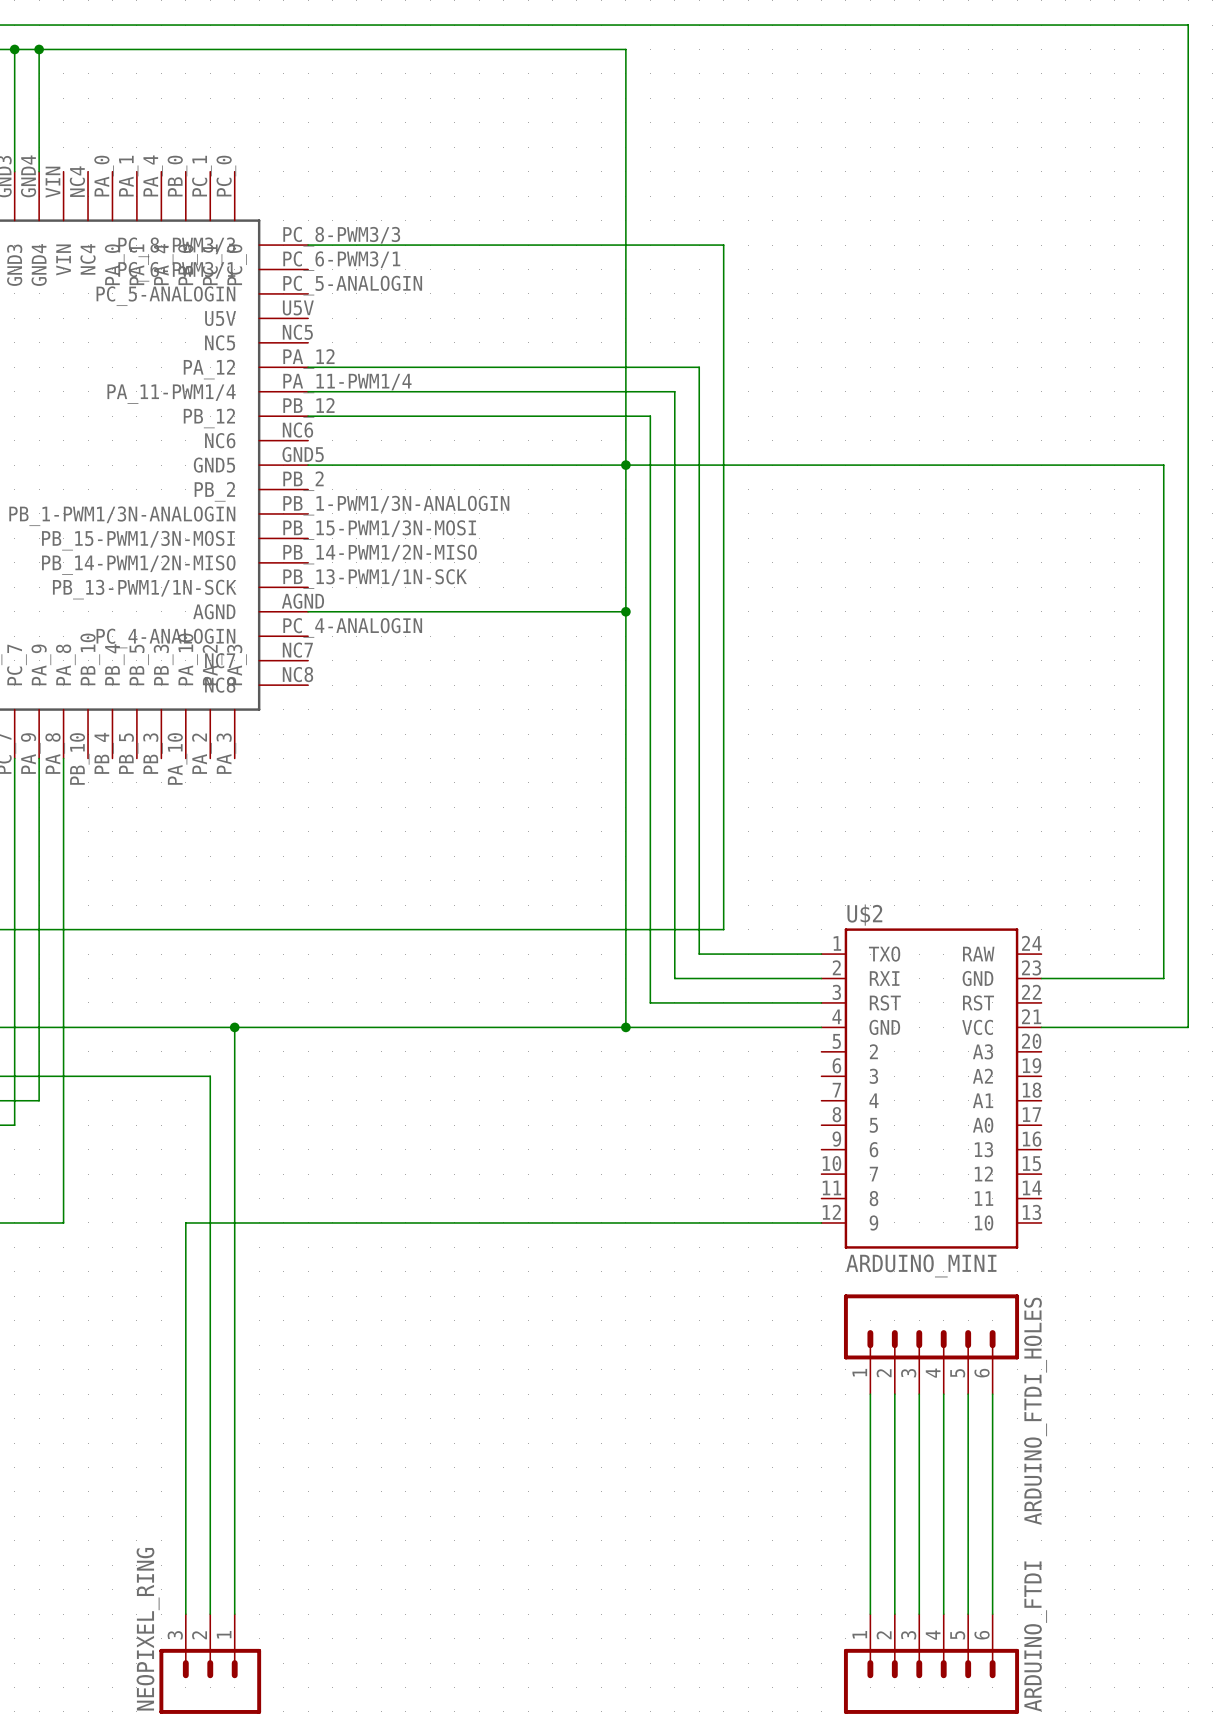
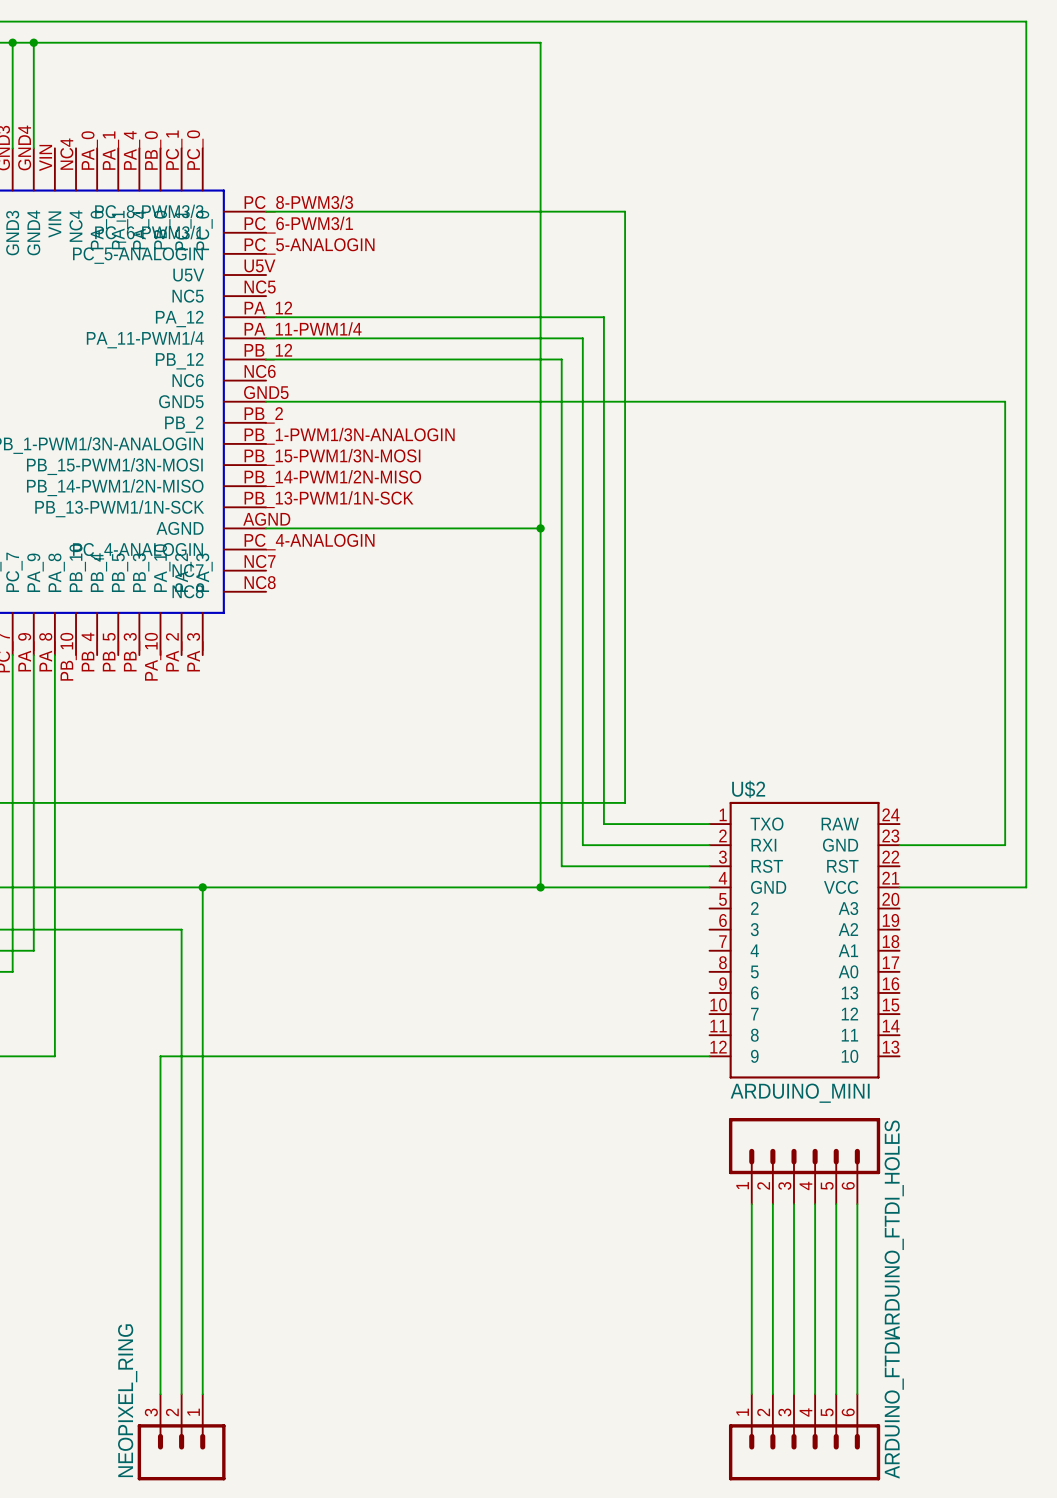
junction: (625, 465) -> none

